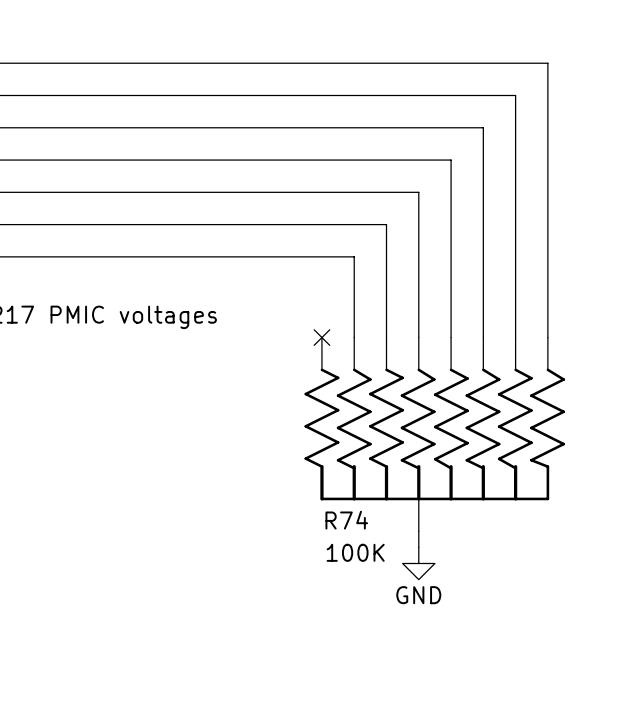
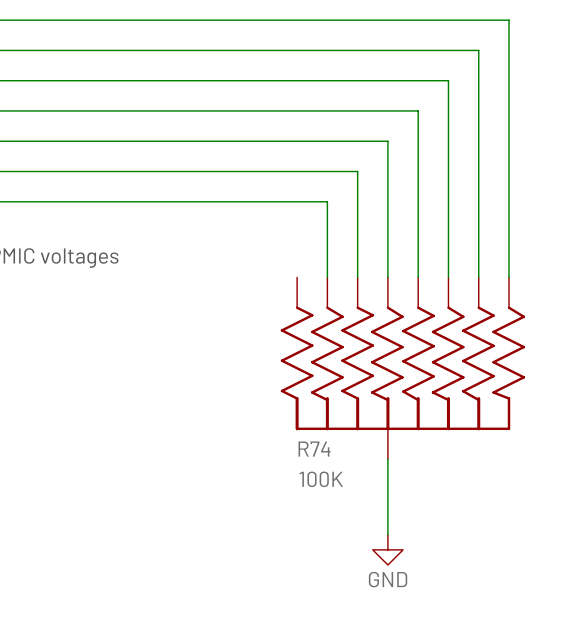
no-connect mark: (321, 337) -> none
wire: none -> (387, 474) (387, 534)
power symbol position: GND (418, 563) -> GND (387, 549)

